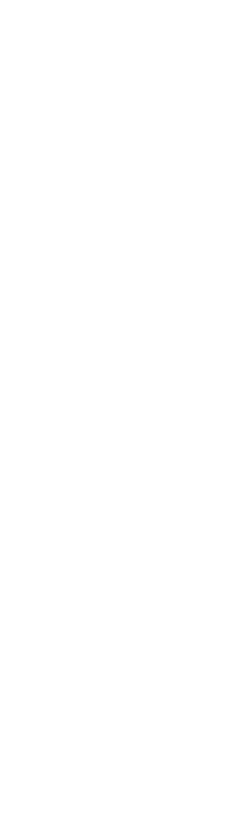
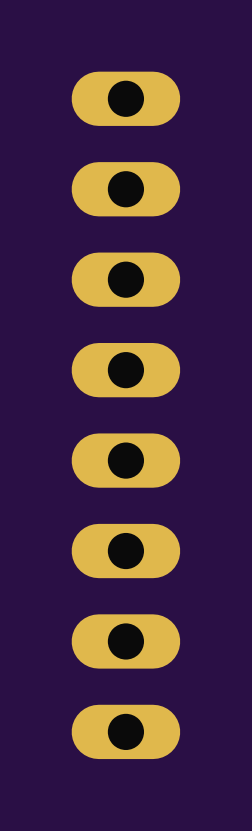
part: none -> (125, 415)

